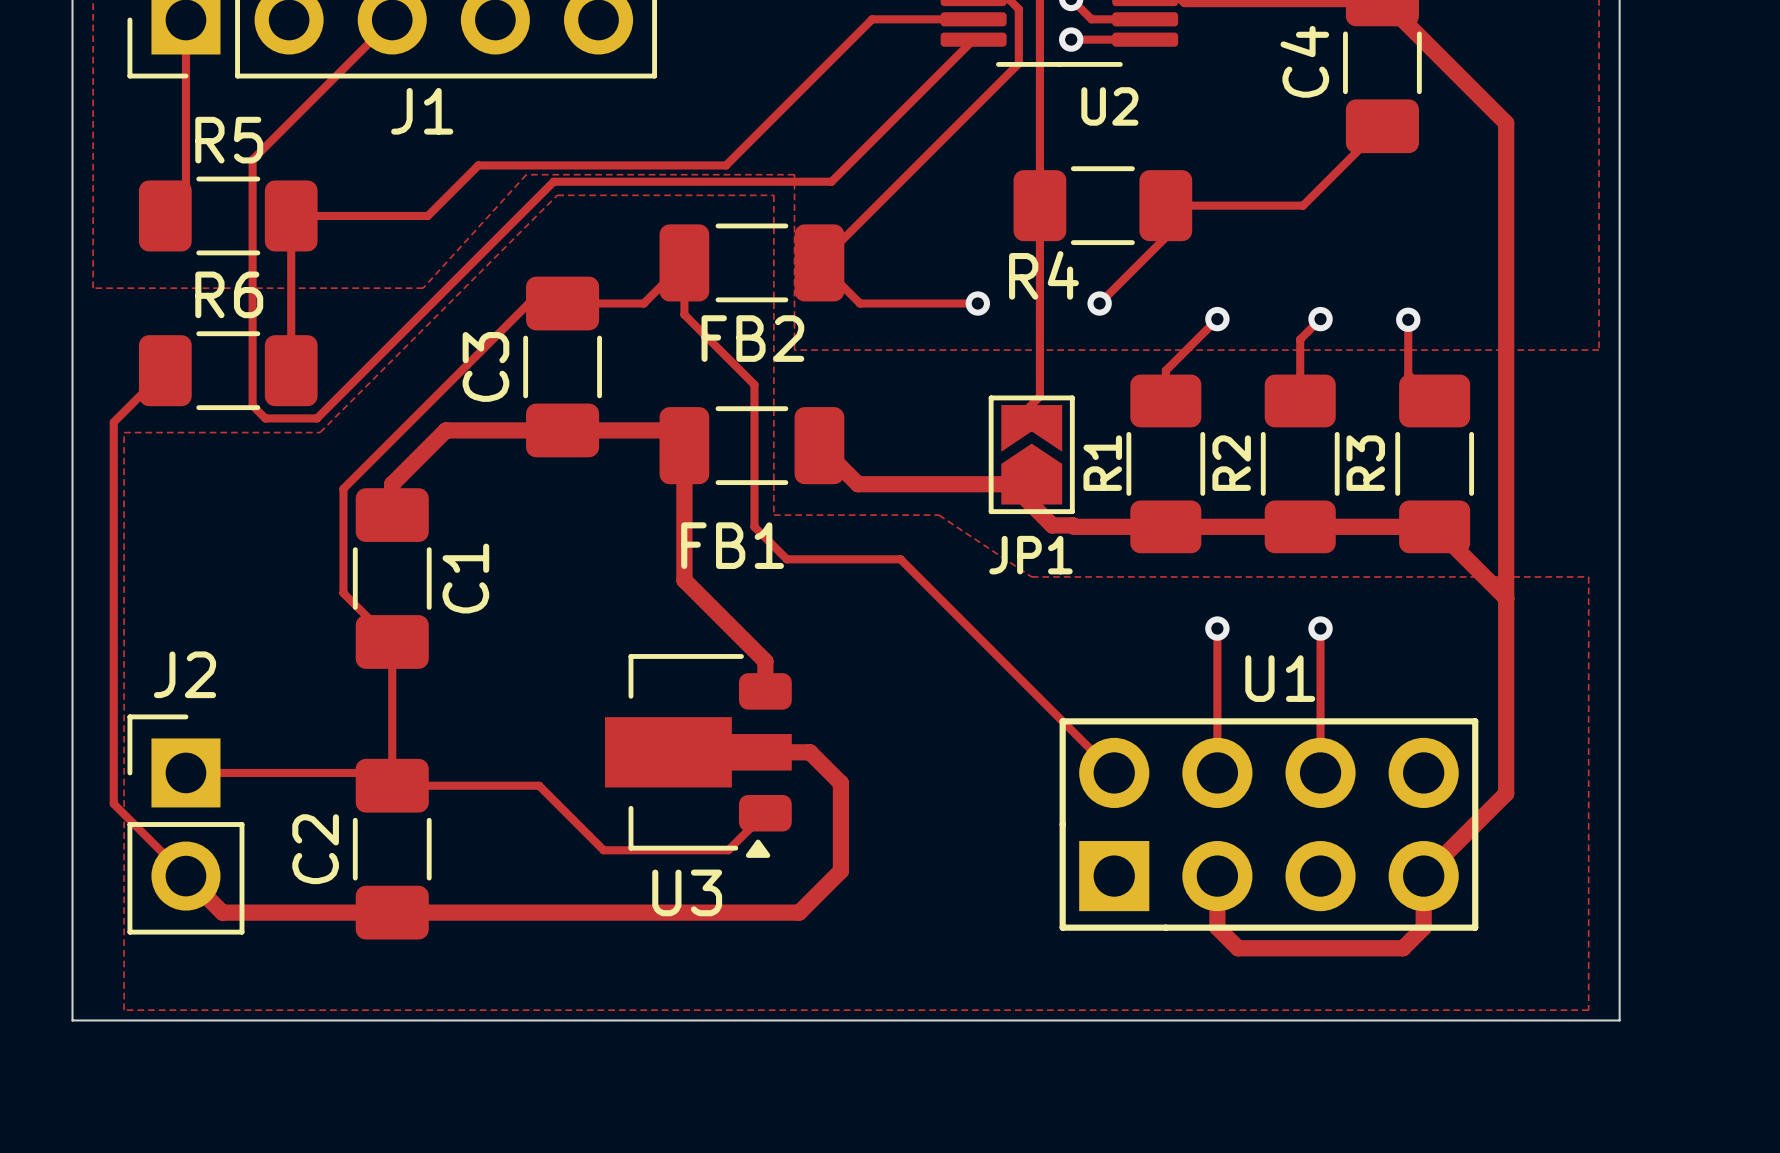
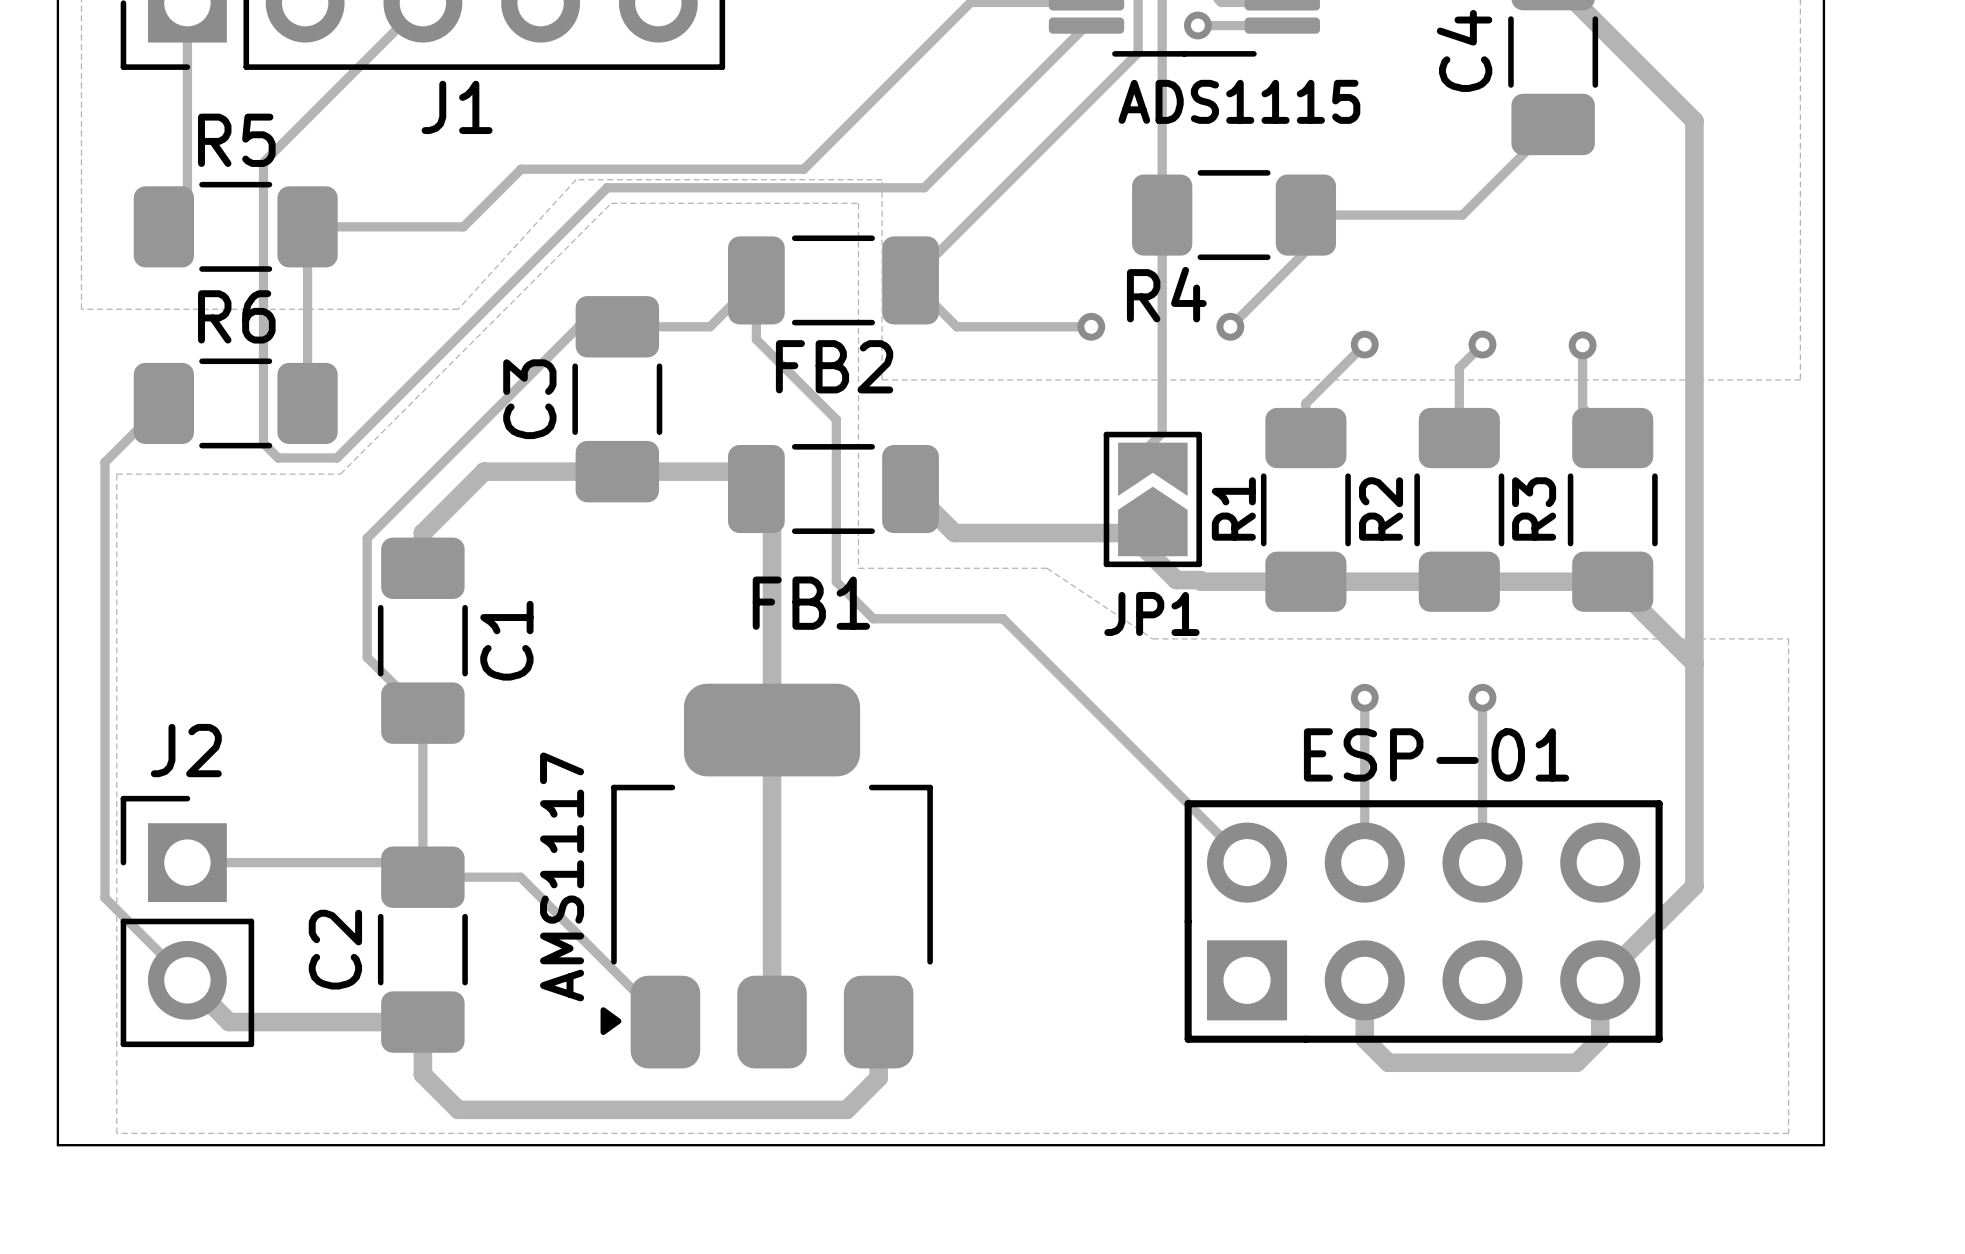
U2 name: U2 (1109, 106) -> ADS1115 (1239, 101)
track: (684, 445) (684, 580) (765, 661) (765, 691) -> none
track: none -> (772, 504) (772, 1022)
U1 name: U1 (1280, 678) -> ESP-01 (1436, 754)
track: (761, 752) (809, 752) (840, 783) (840, 870) (799, 912) (392, 912) -> (878, 1022) (878, 1077) (846, 1109) (458, 1109) (422, 1074) (422, 1022)
U3: (698, 755) -> none
AMS1117: none -> (766, 876)
track: (477, 785) (539, 785) (603, 850) (728, 850) (765, 813) -> (520, 877) (665, 1022)

